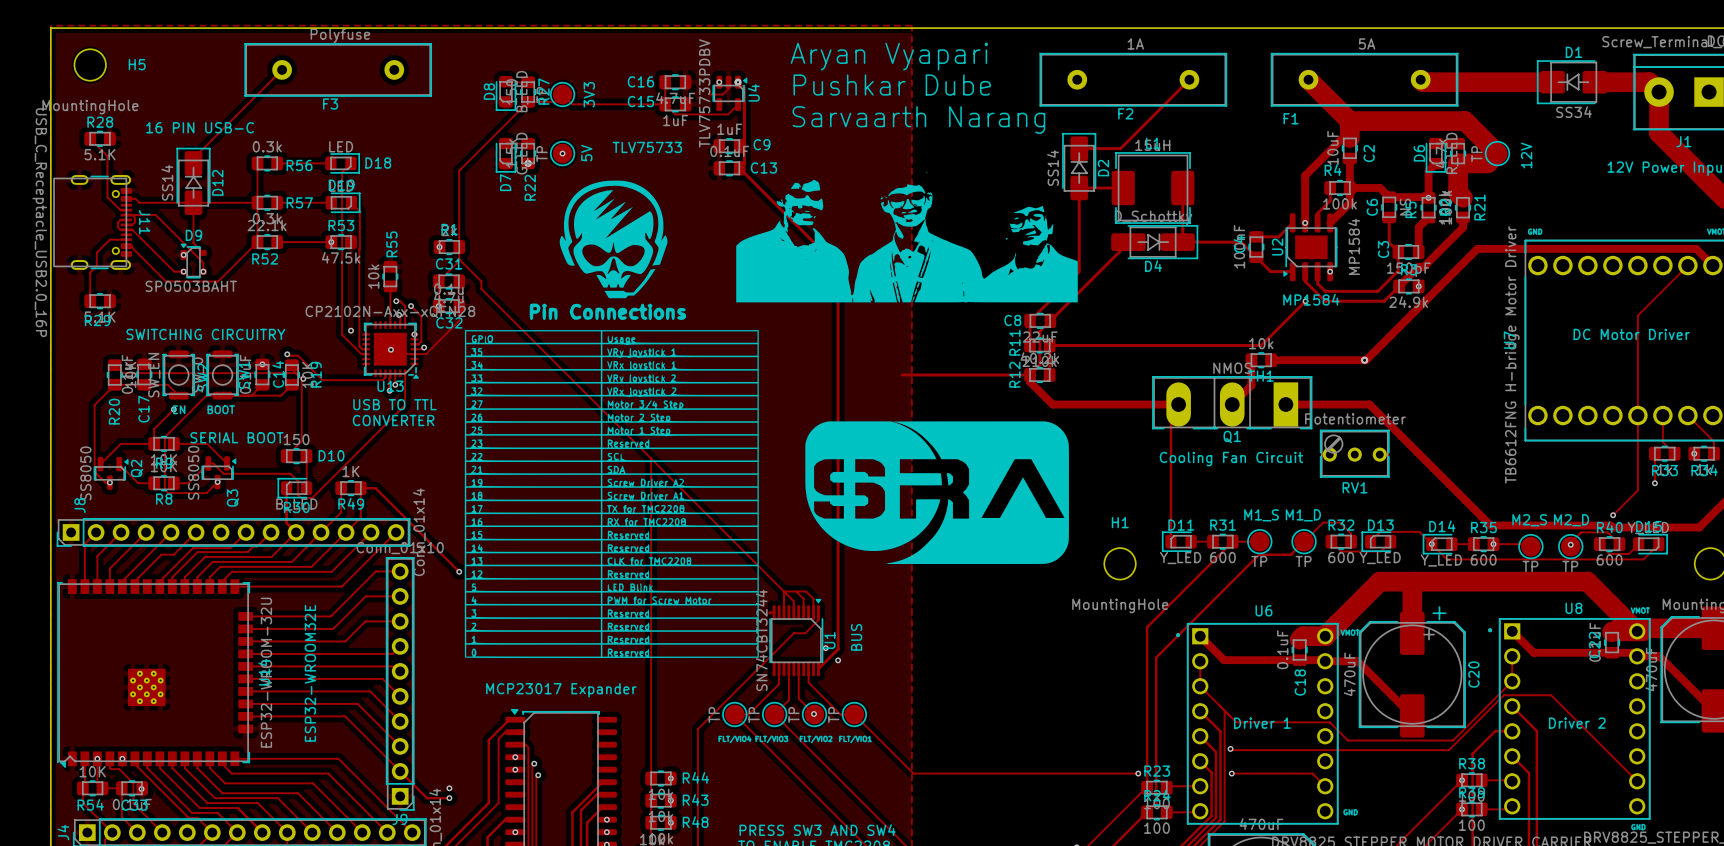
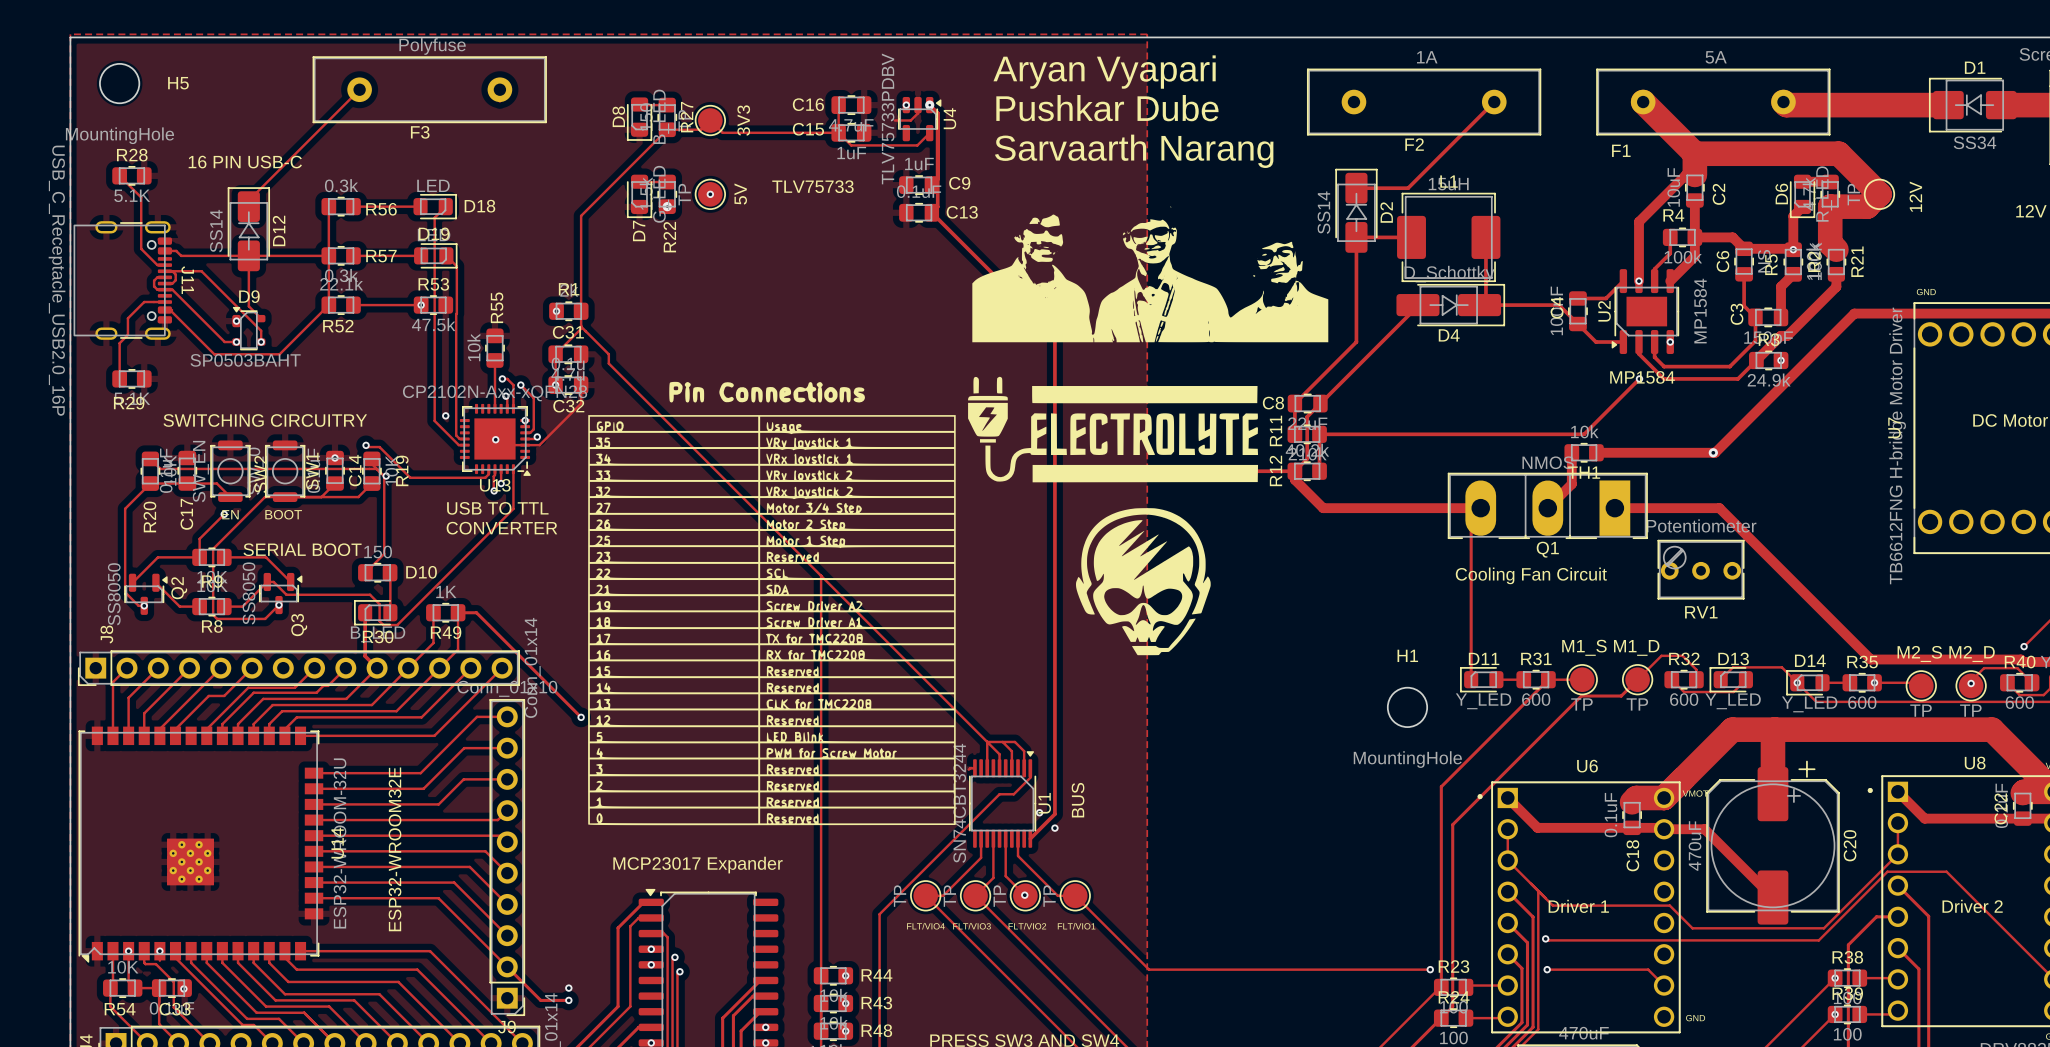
drawing: none -> [972, 206, 1329, 343]
drawing: [736, 172, 1078, 303] -> none
drawing: [559, 180, 668, 299] -> none
drawing: none -> [968, 376, 1259, 483]
drawing: none -> [1075, 508, 1211, 656]
drawing: [805, 421, 1069, 565] -> none

